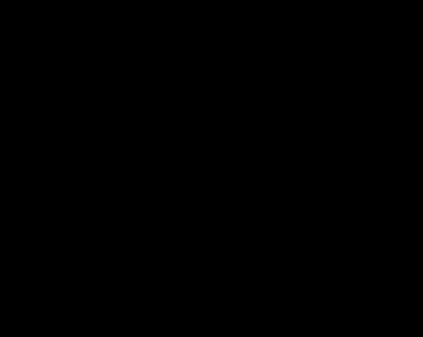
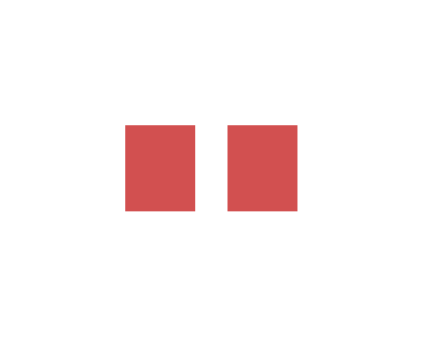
part: none -> (211, 168)

